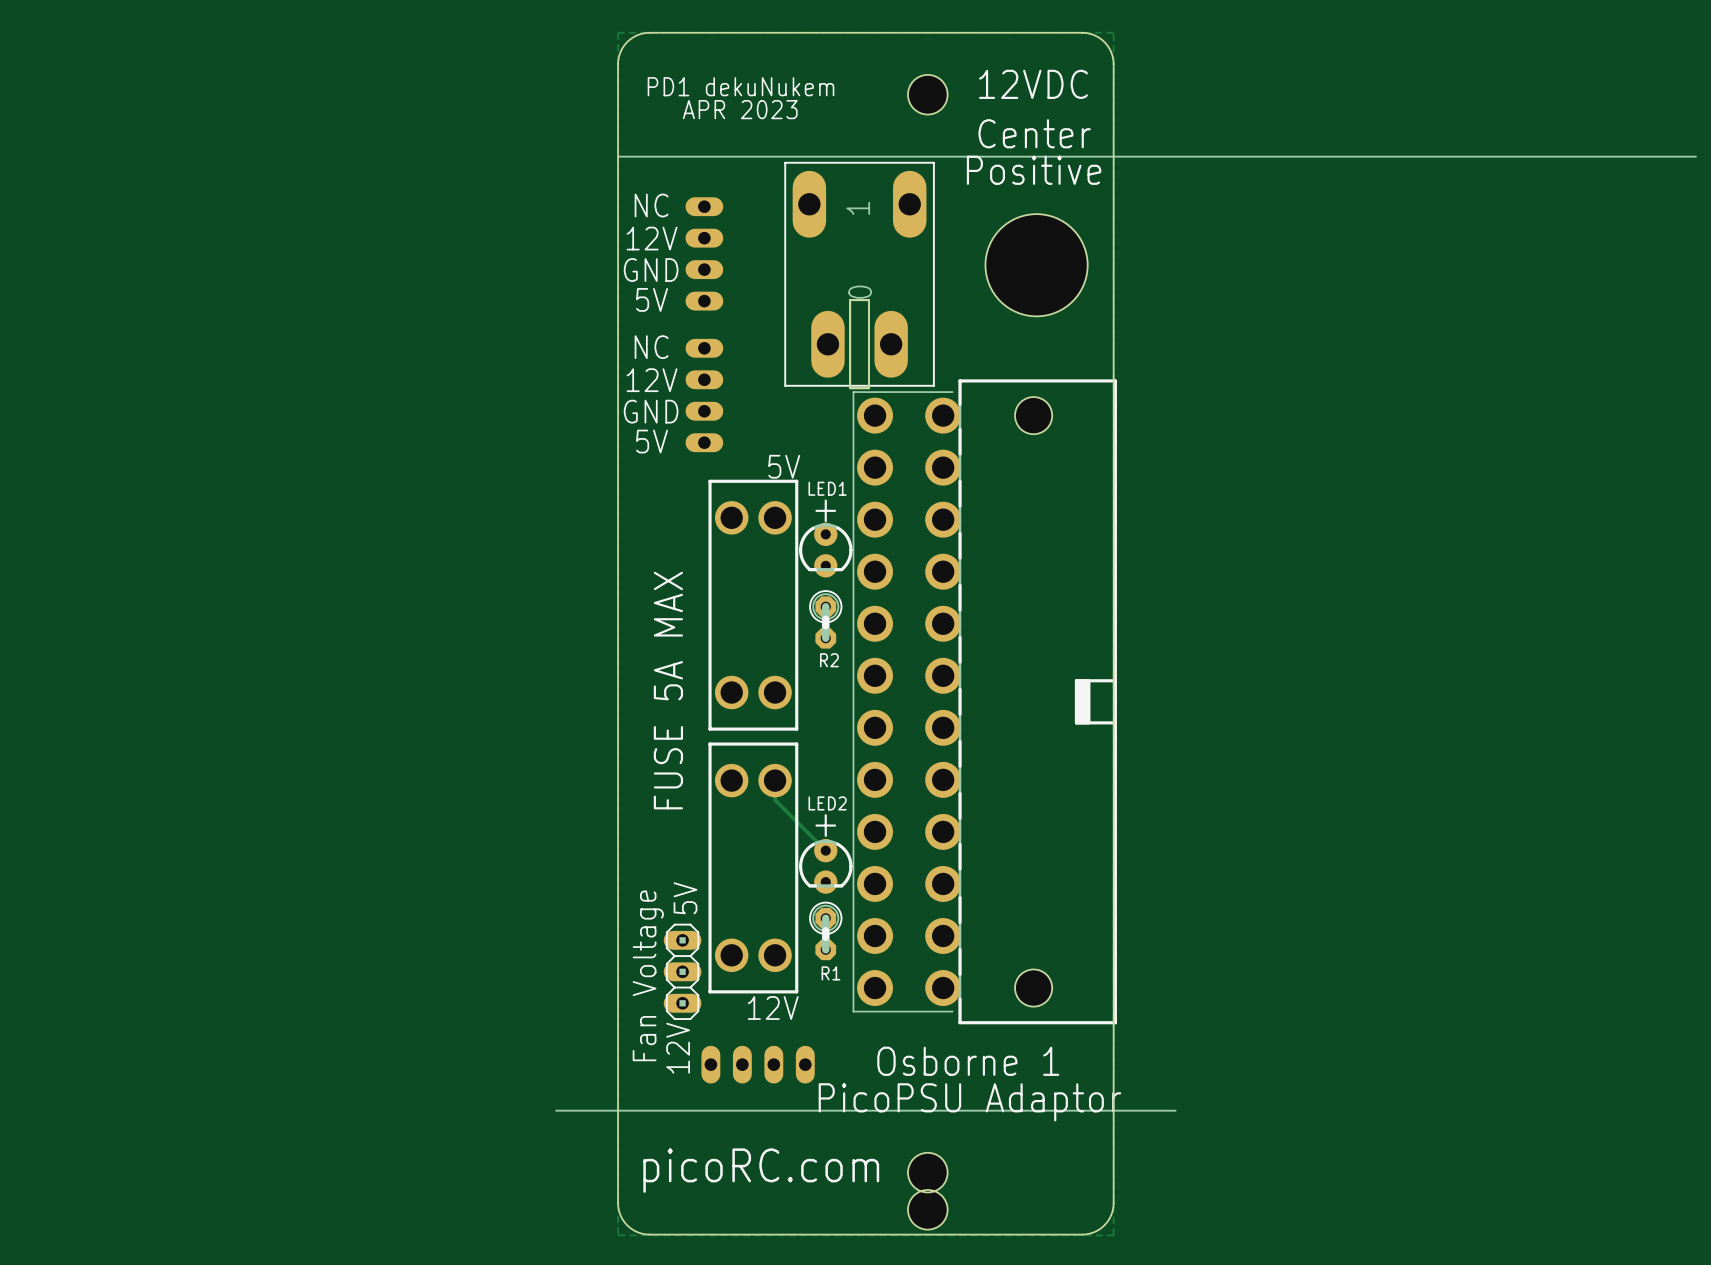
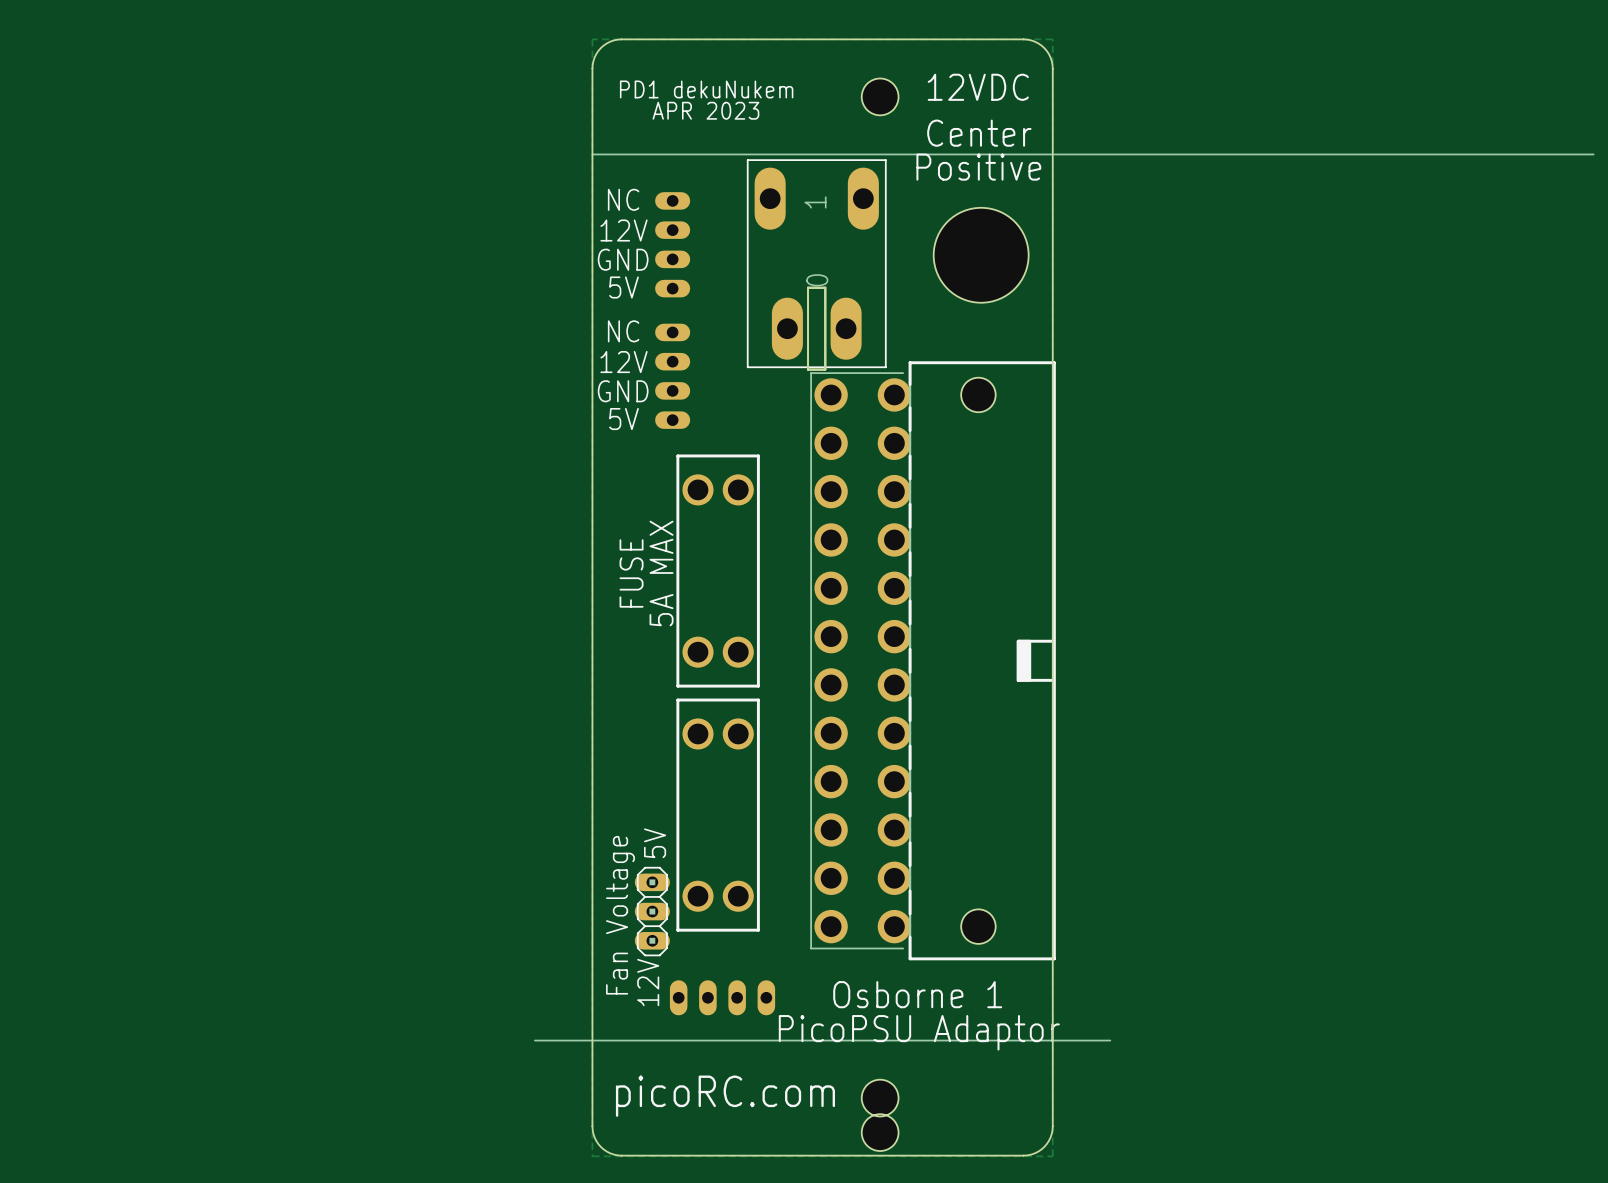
text: 5V (784, 466) -> none
text: + (825, 510) -> none
LED1: (825, 550) -> none
text: none -> FUSE (631, 573)
R2: (825, 619) -> none
text: FUSE 5A MAX (668, 690) -> 5A MAX (661, 573)
track: (775, 780) (775, 799) (825, 850) -> none
text: + (825, 825) -> none
LED2: (825, 866) -> none
R1: (825, 930) -> none
text: 12V (773, 1008) -> none

